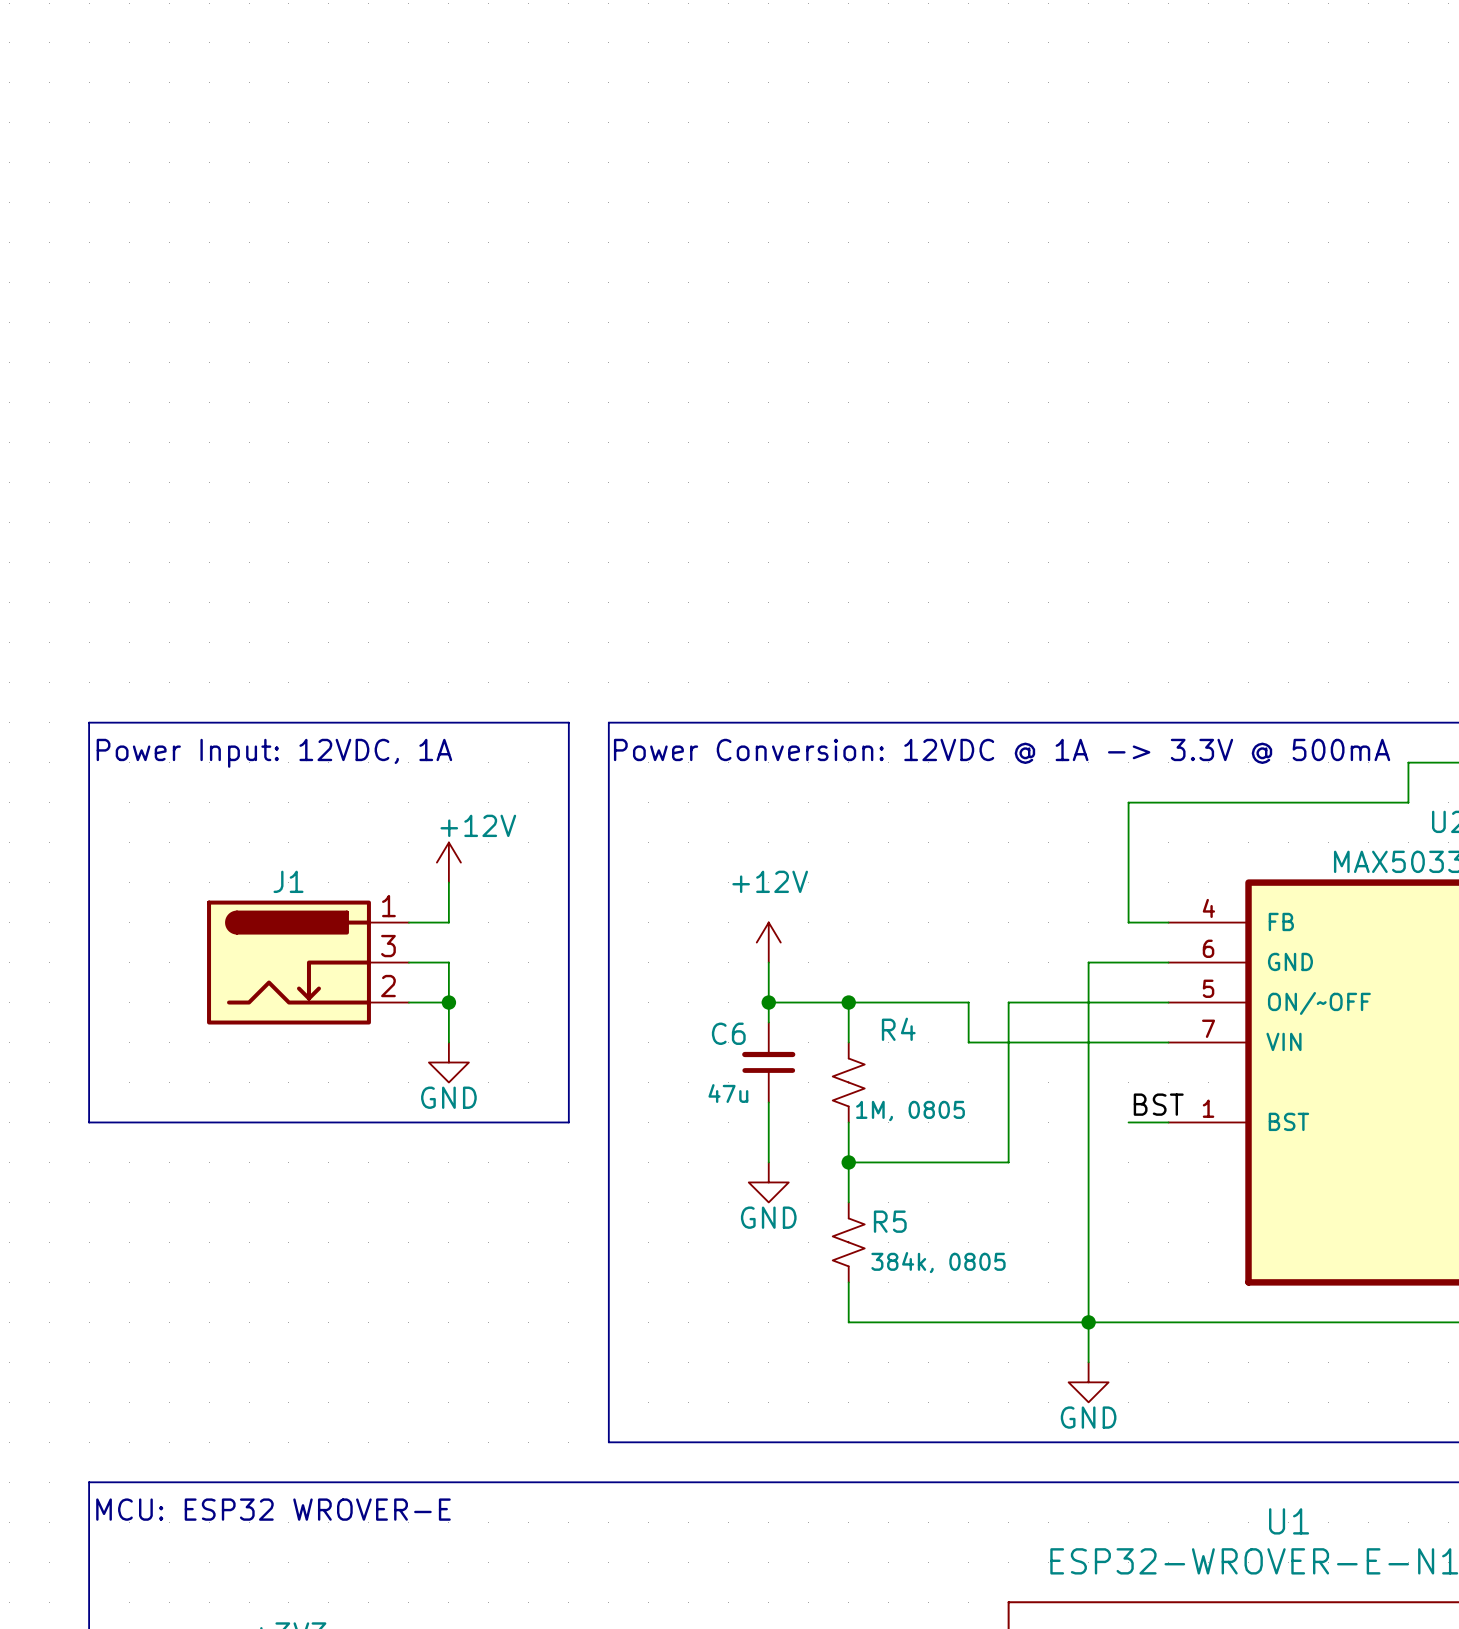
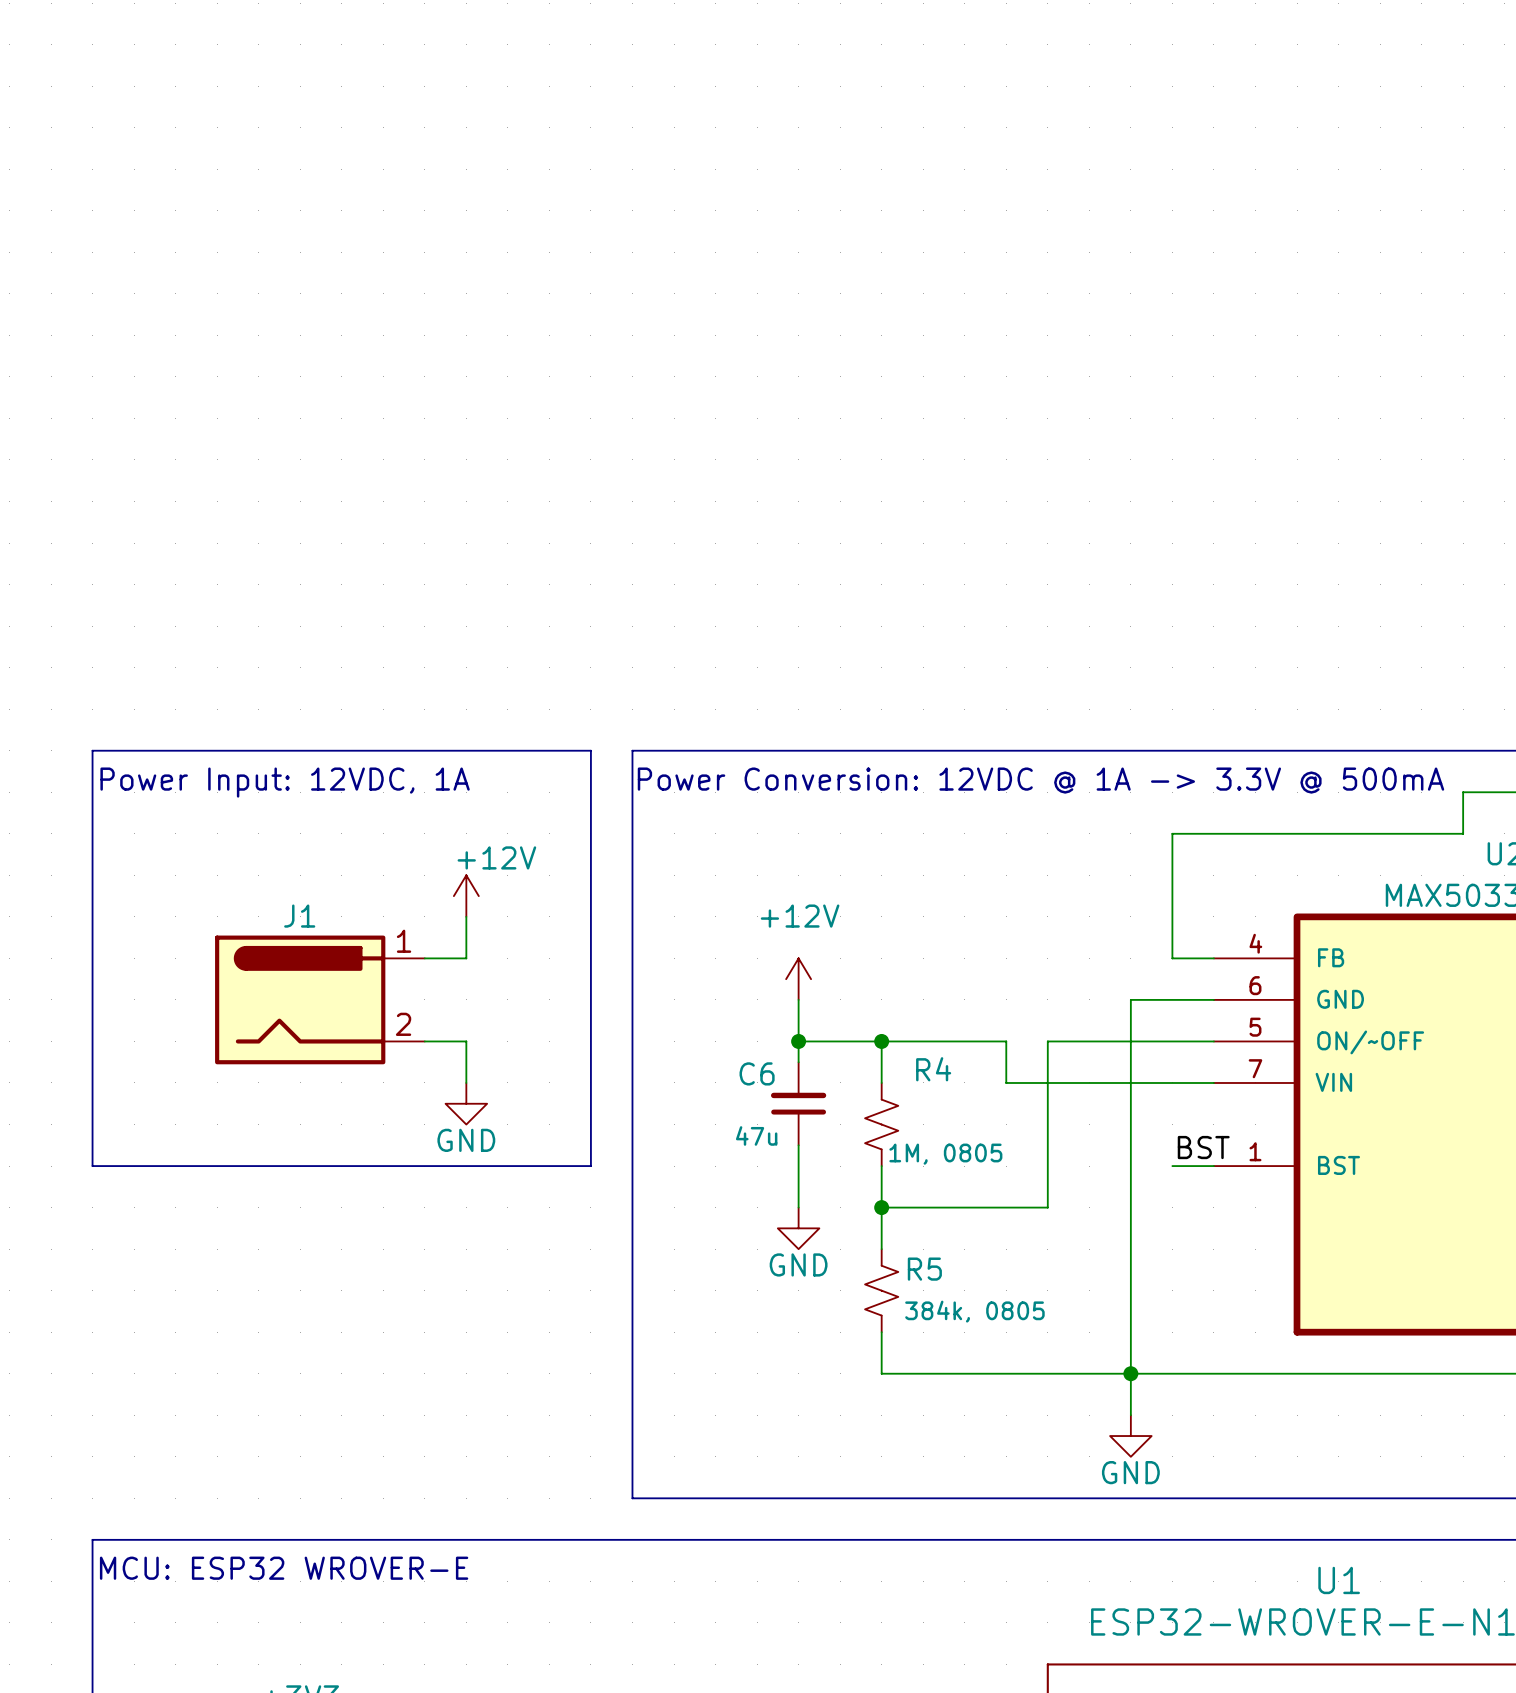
J1 symbol: [207, 900, 409, 1025] -> [215, 935, 425, 1065]
wire: (408, 962) (448, 962) (448, 1002) -> none
junction: (448, 1002) -> none

